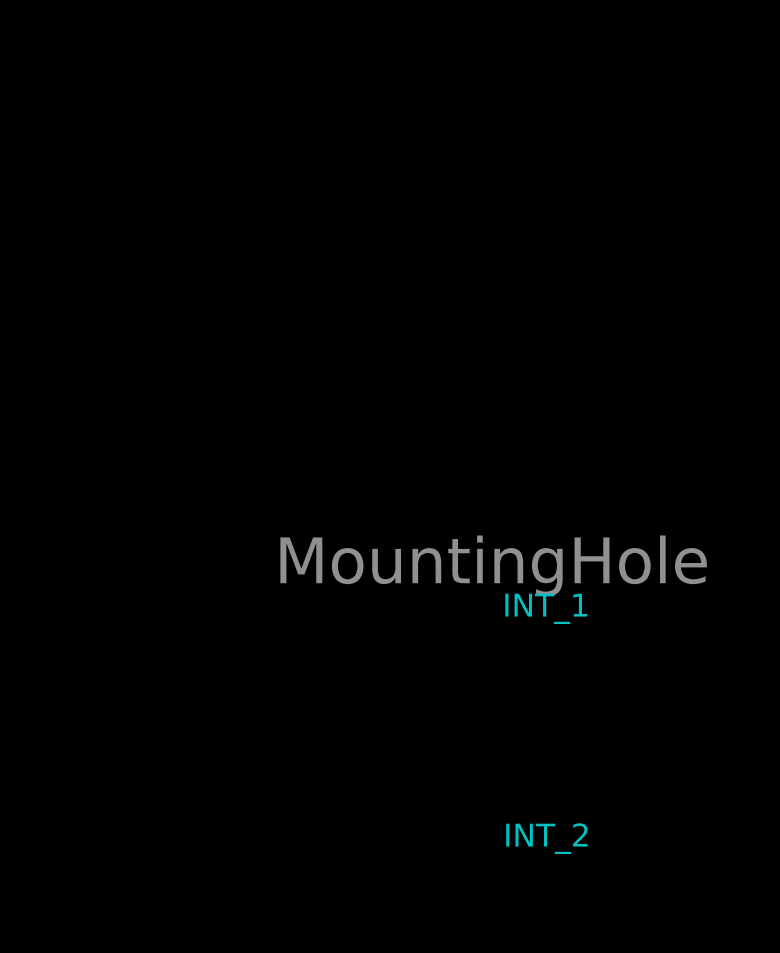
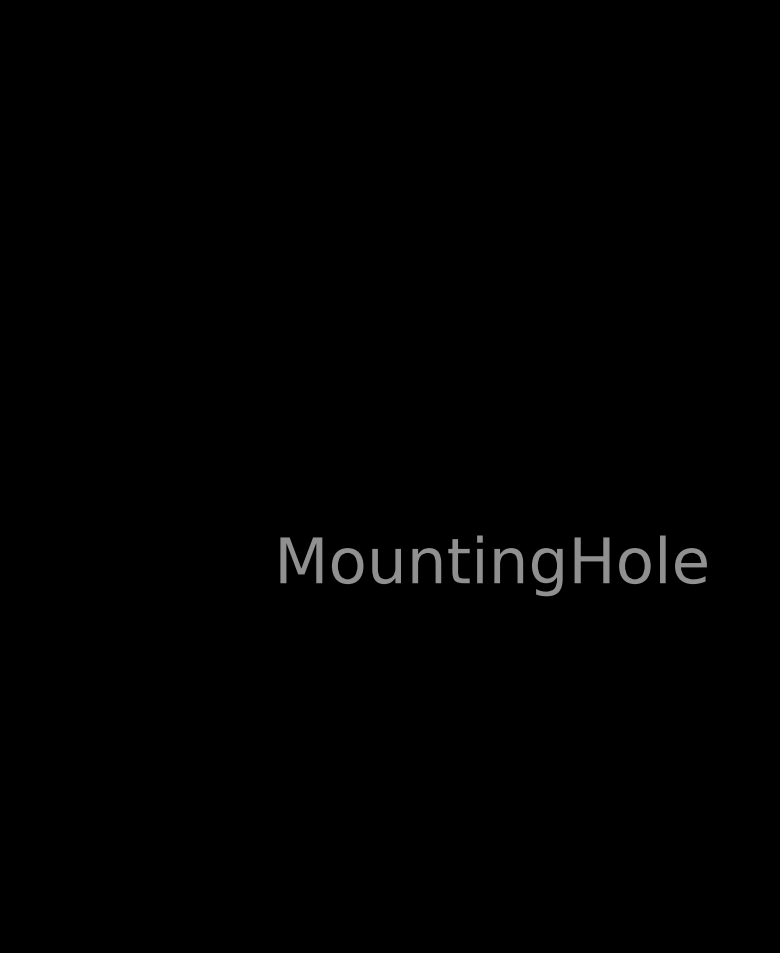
text: INT_1 (546, 608) -> none
text: INT_2 (546, 838) -> none

